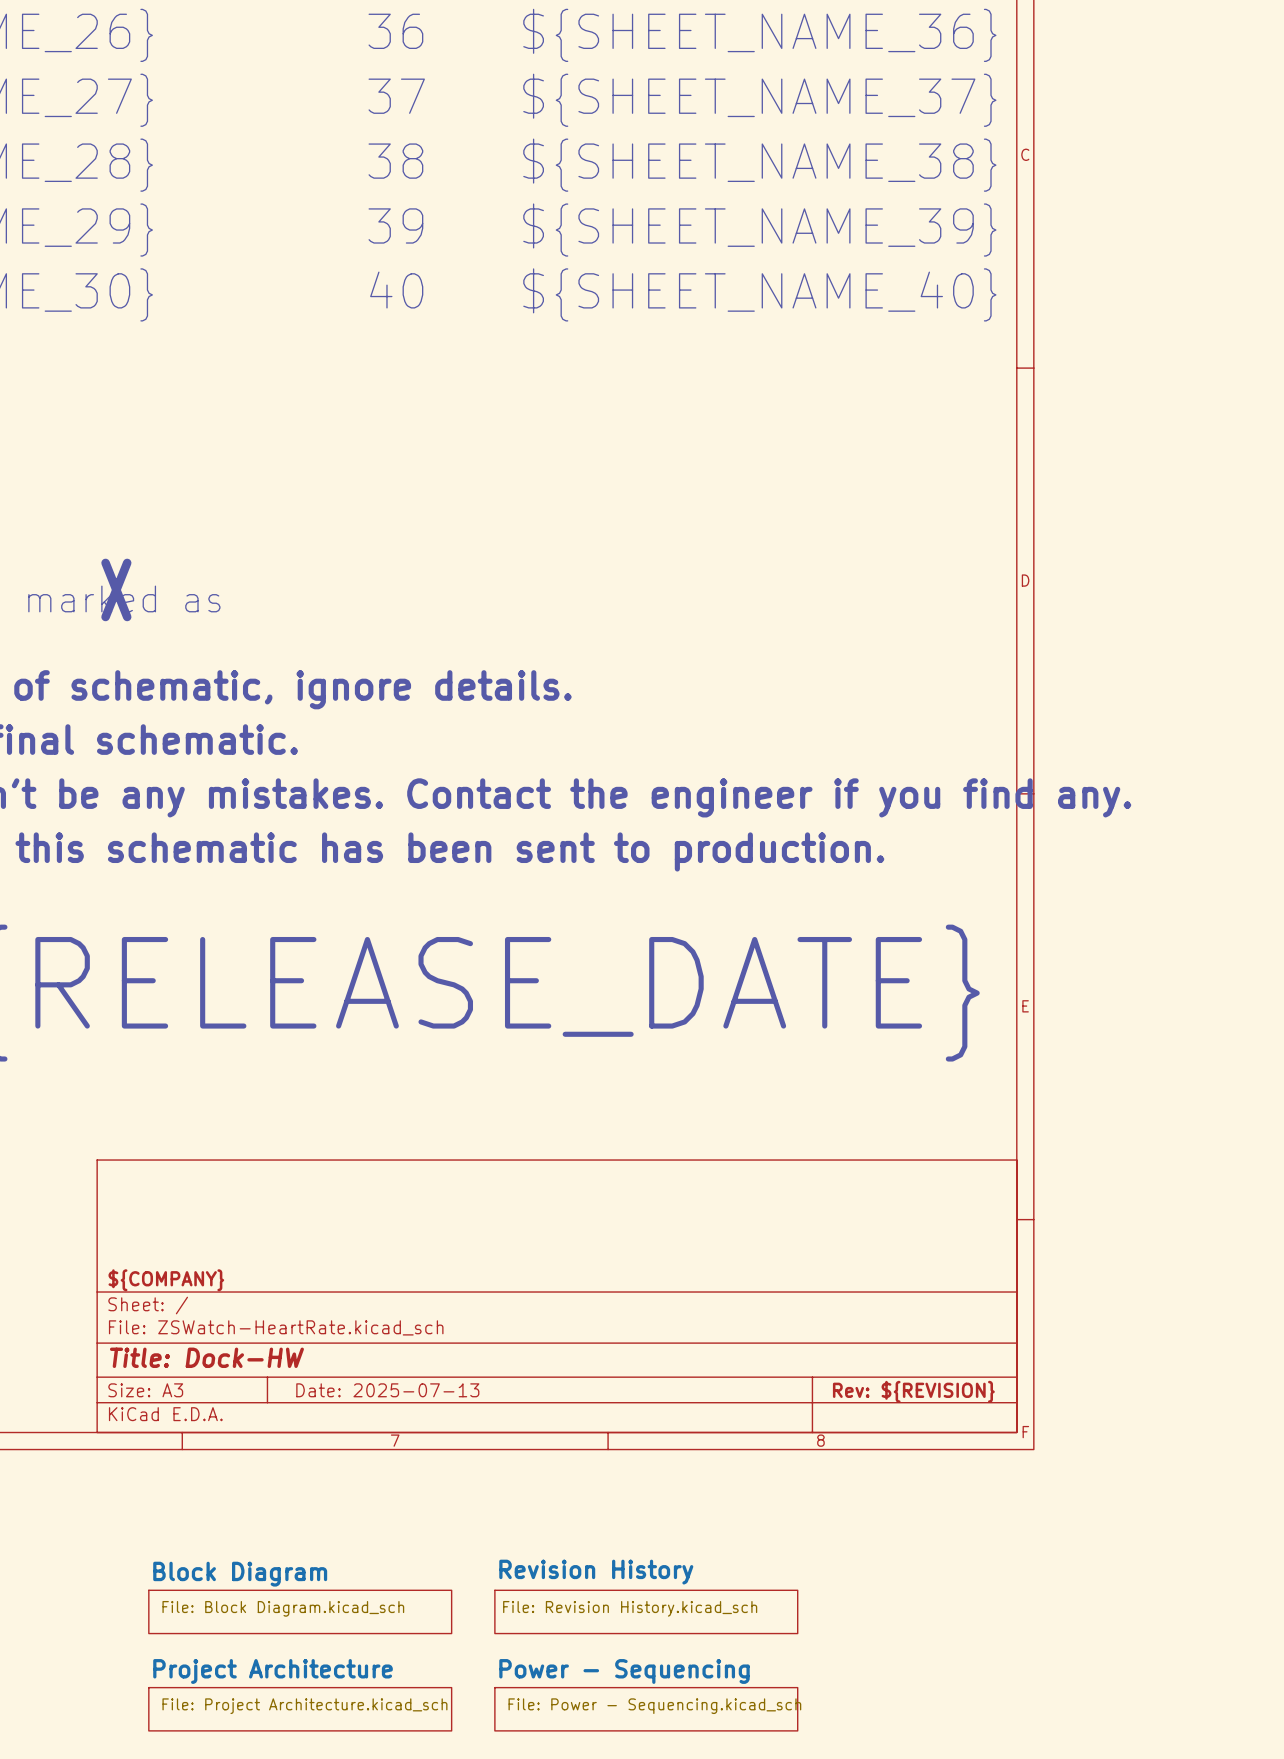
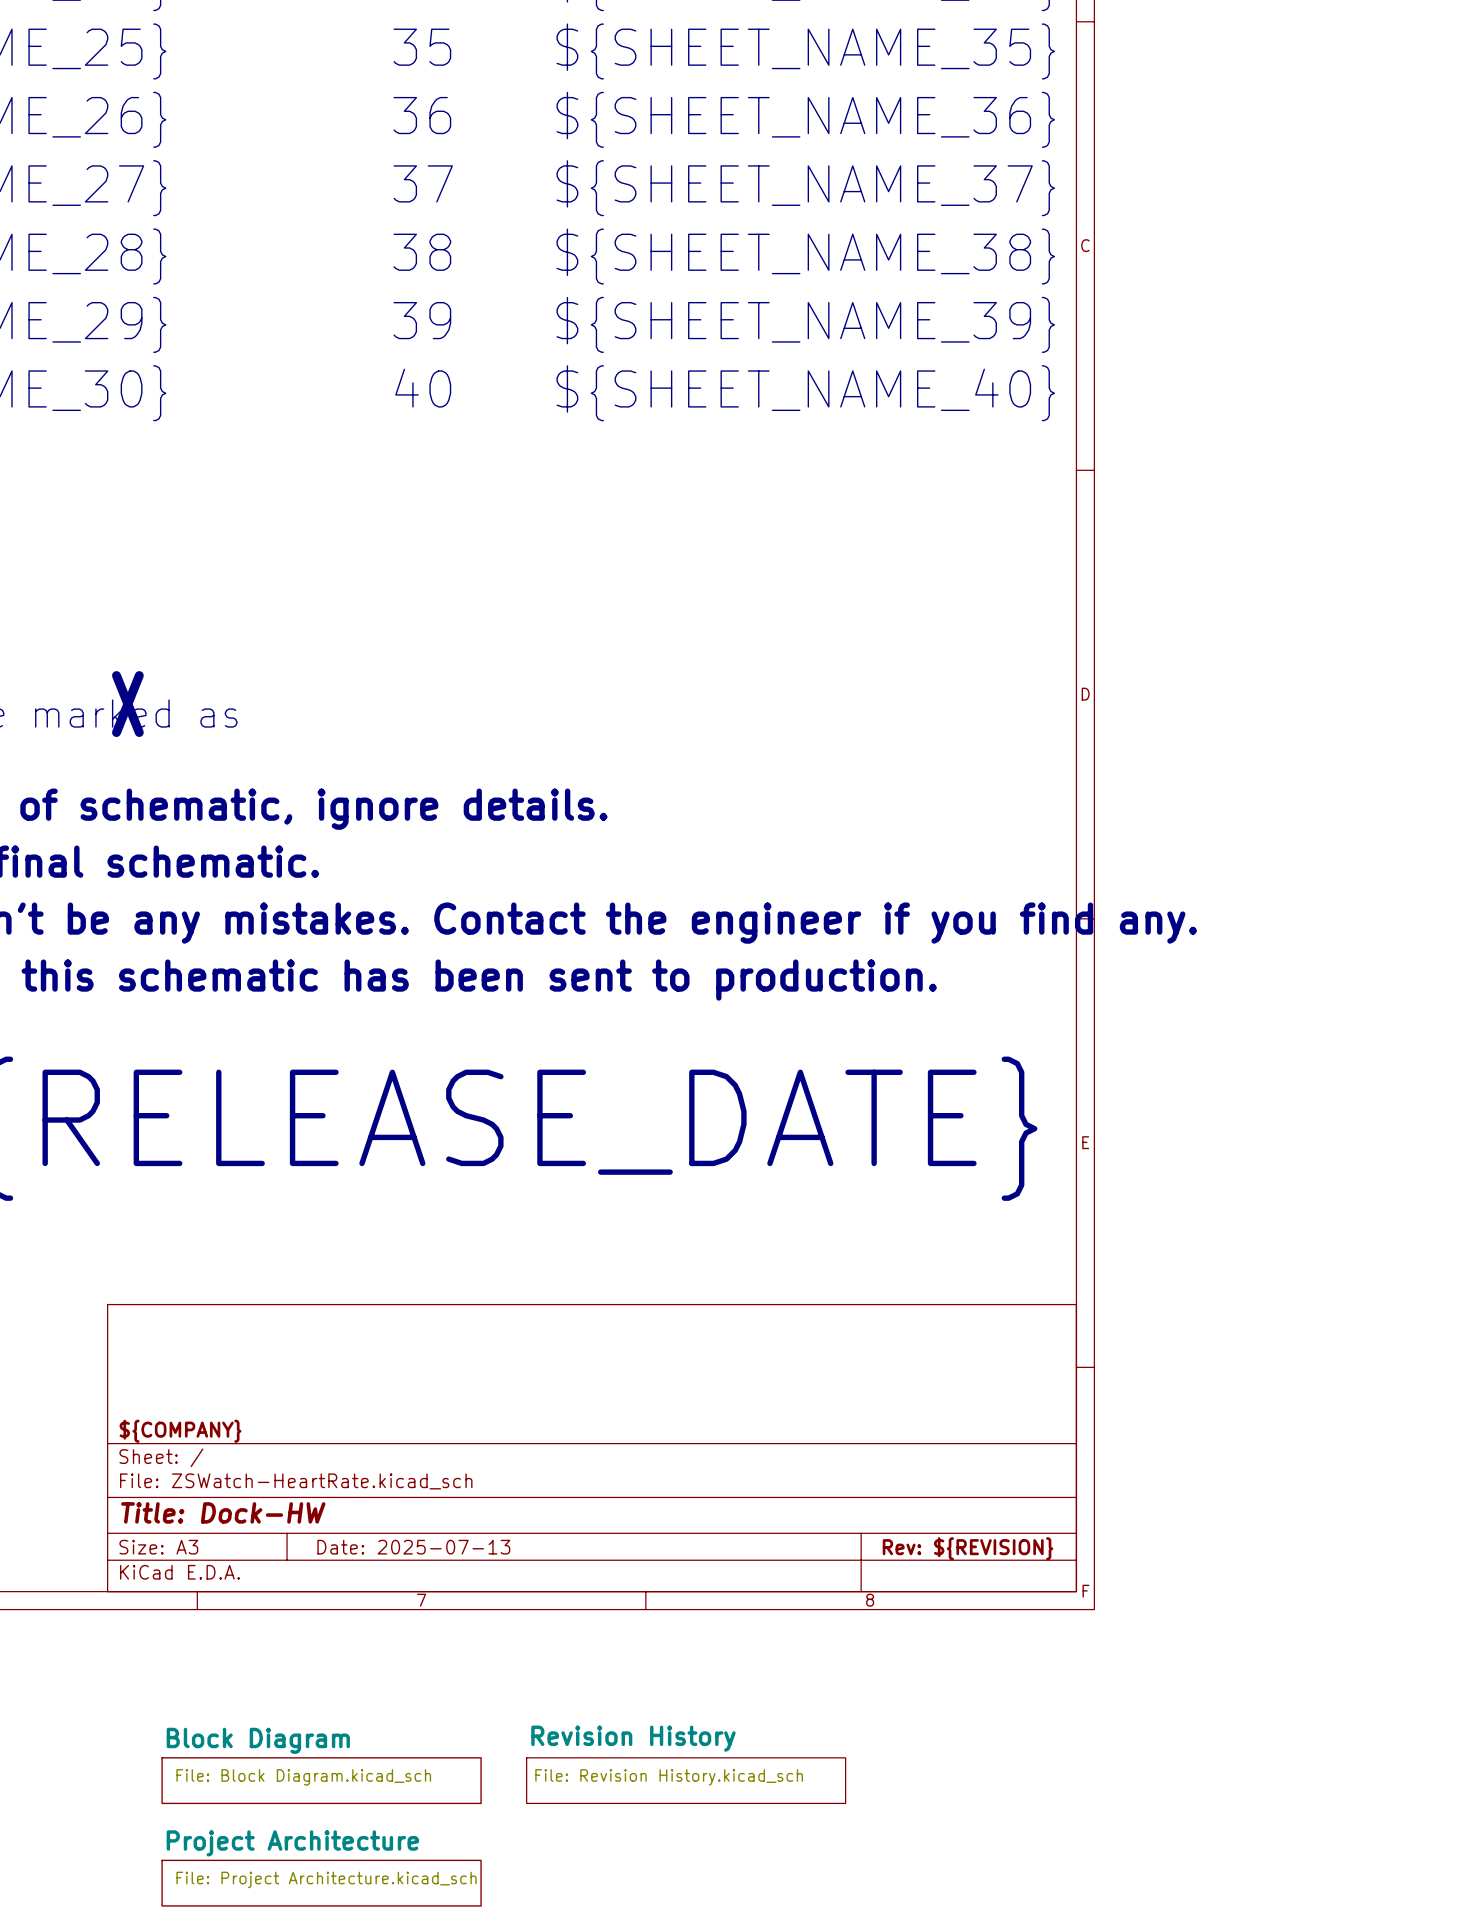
sheet Power - Sequencing: File: Power - Sequencing.kicad_sch (646, 1709) -> none

